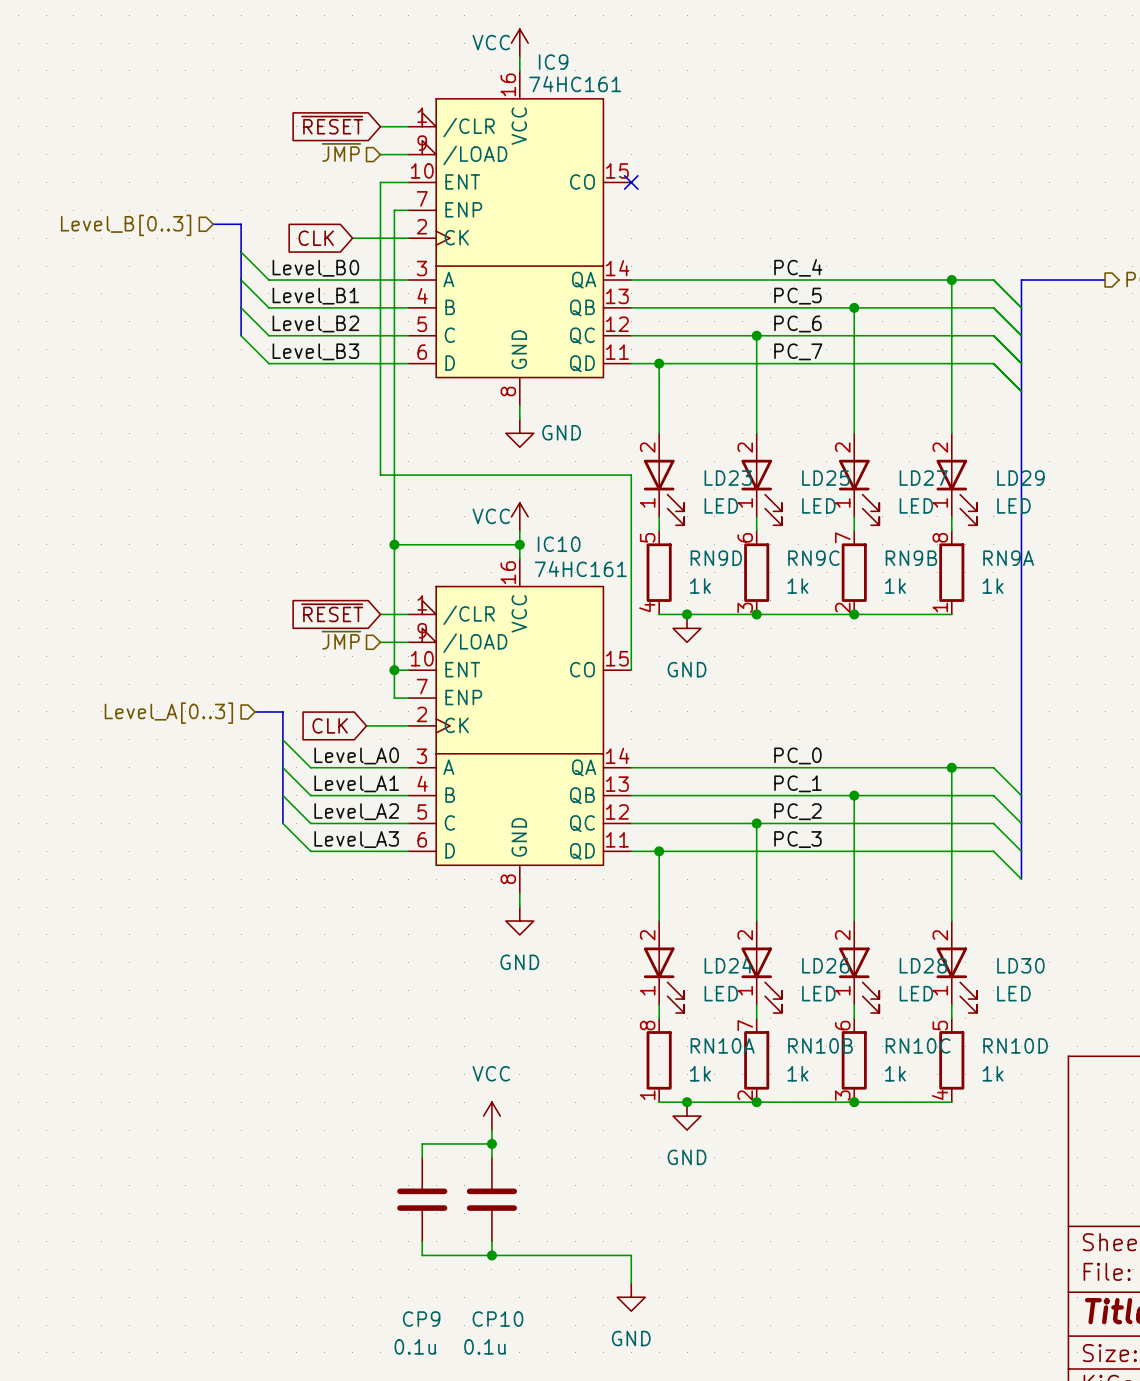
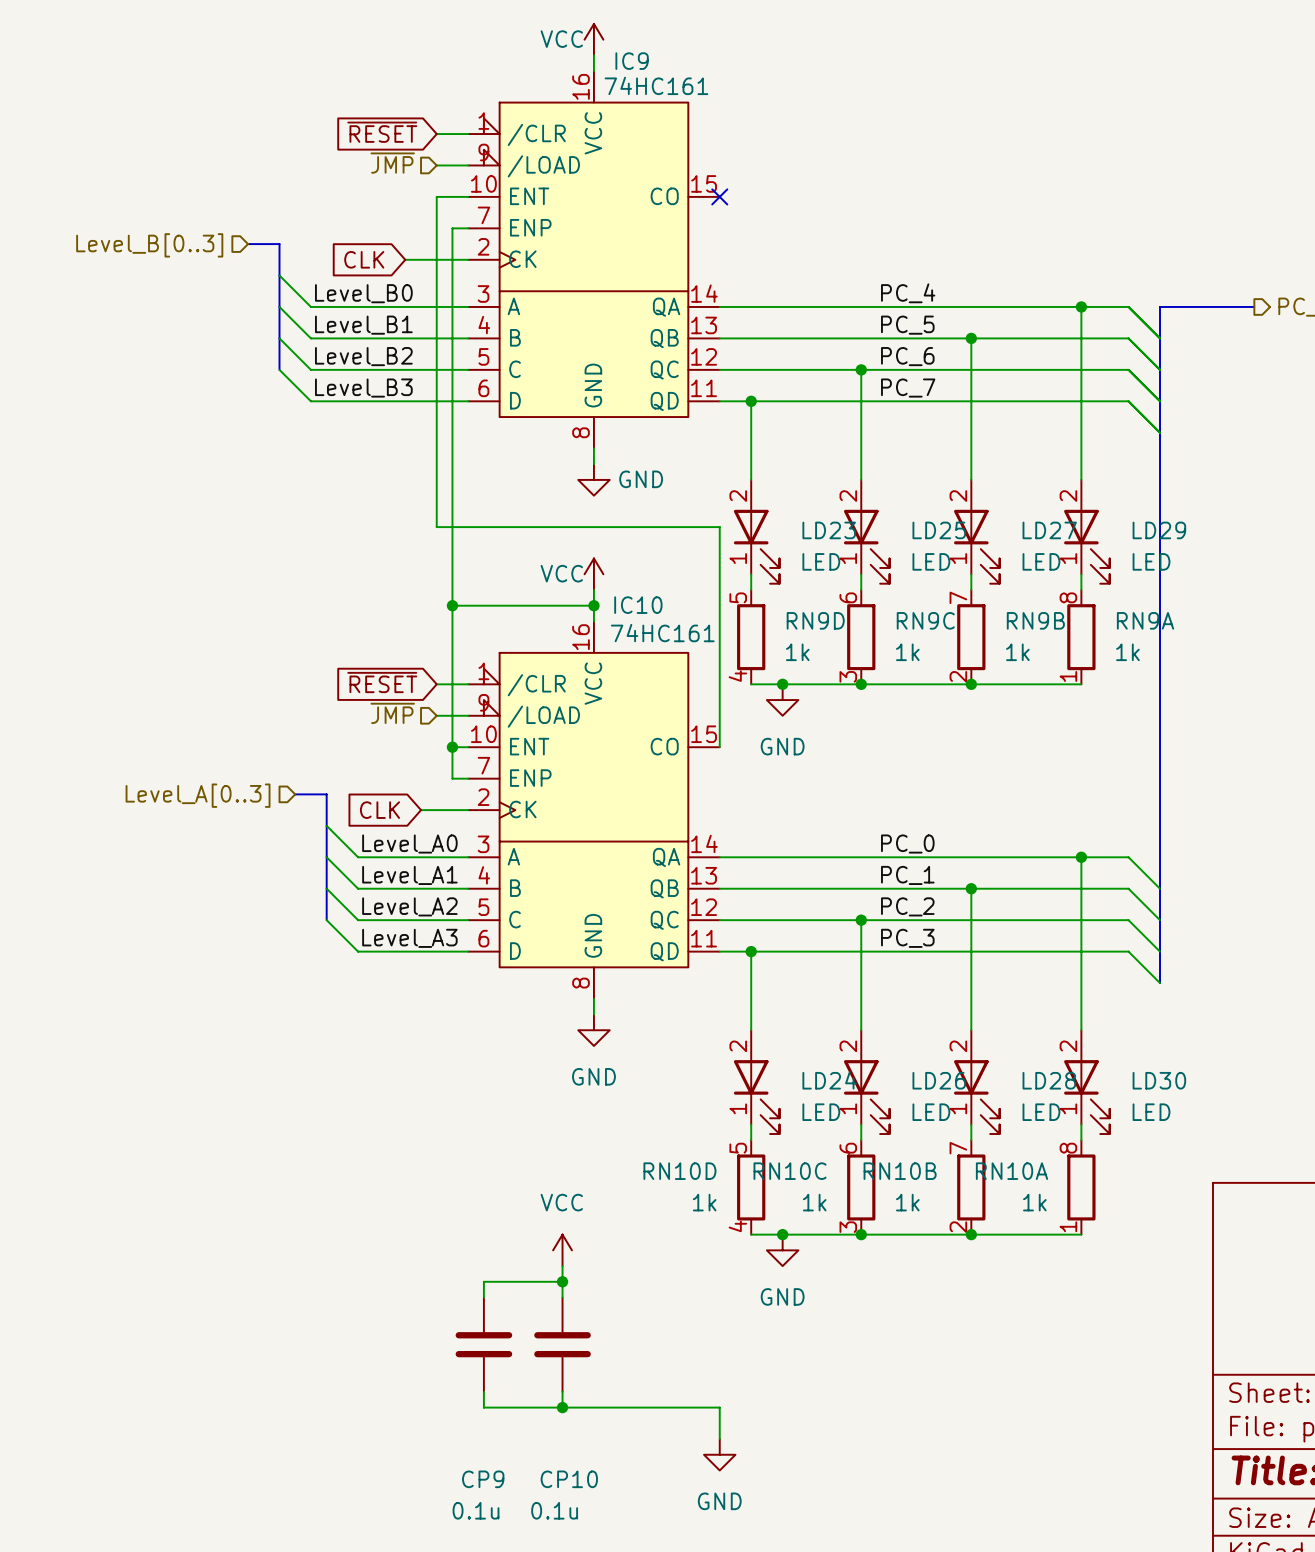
RN10A name position: RN10A (722, 1045) -> RN10A (1012, 1171)
RN10B name position: RN10B (820, 1045) -> RN10B (900, 1171)
RN10C name position: RN10C (918, 1045) -> RN10C (790, 1171)
RN10D name position: RN10D (1015, 1045) -> RN10D (679, 1171)
RN10A position: (659, 1060) -> (1081, 1187)
RN10B position: (756, 1060) -> (971, 1187)
RN10C position: (854, 1060) -> (861, 1187)
RN10D position: (951, 1060) -> (751, 1187)
RN10A value position: 1k (700, 1073) -> 1k (1034, 1202)
RN10C value position: 1k (895, 1073) -> 1k (814, 1202)
RN10D value position: 1k (993, 1073) -> 1k (704, 1202)

